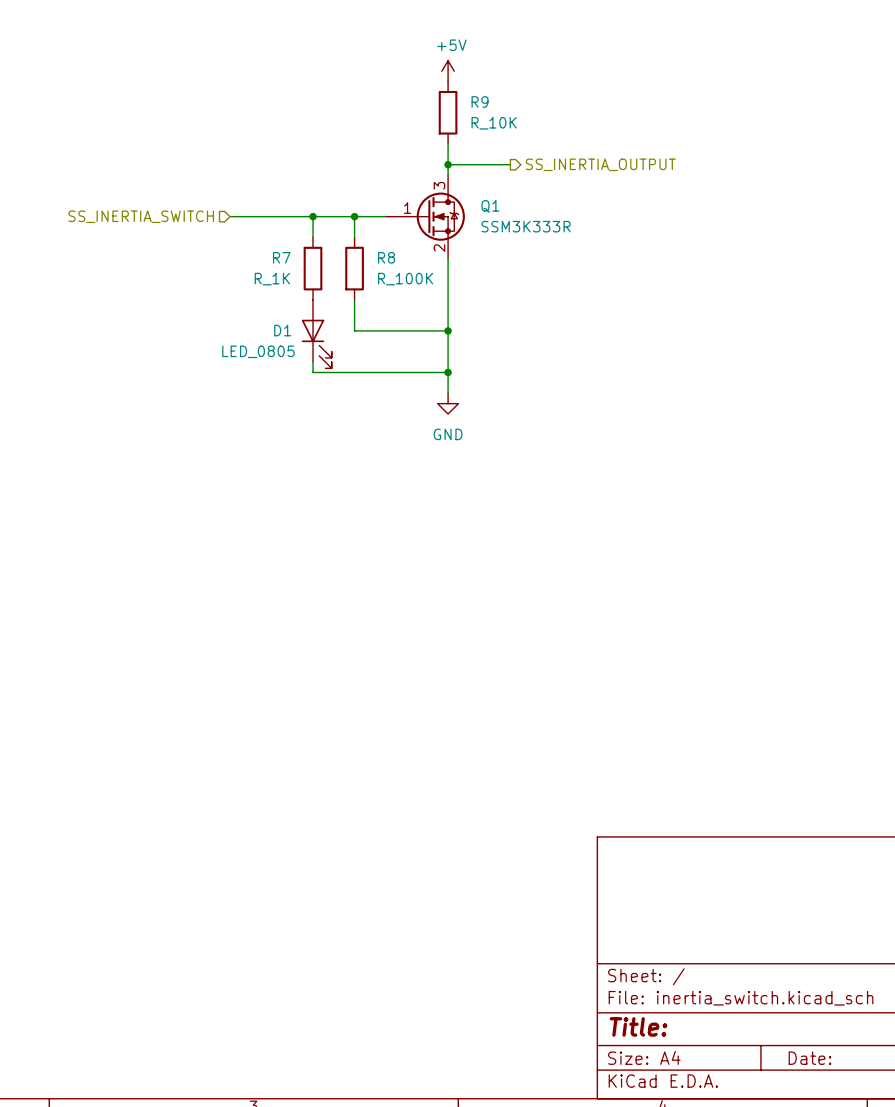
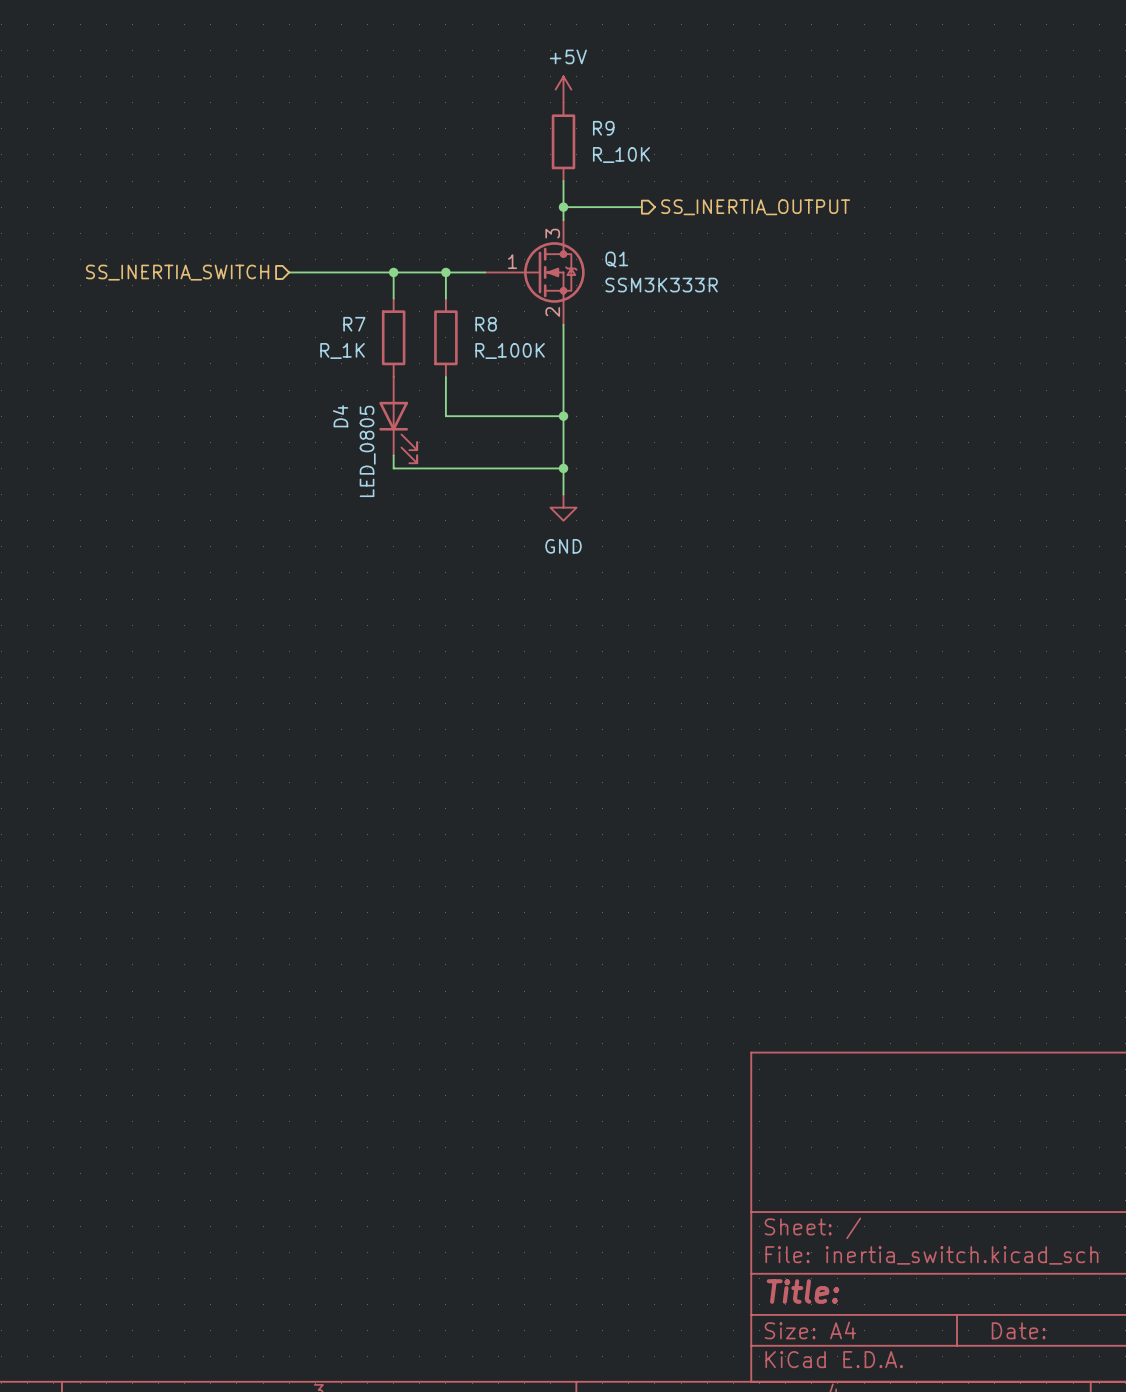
D1: LED_0805 (316, 334) -> none
D4: none -> LED_0805 (398, 420)

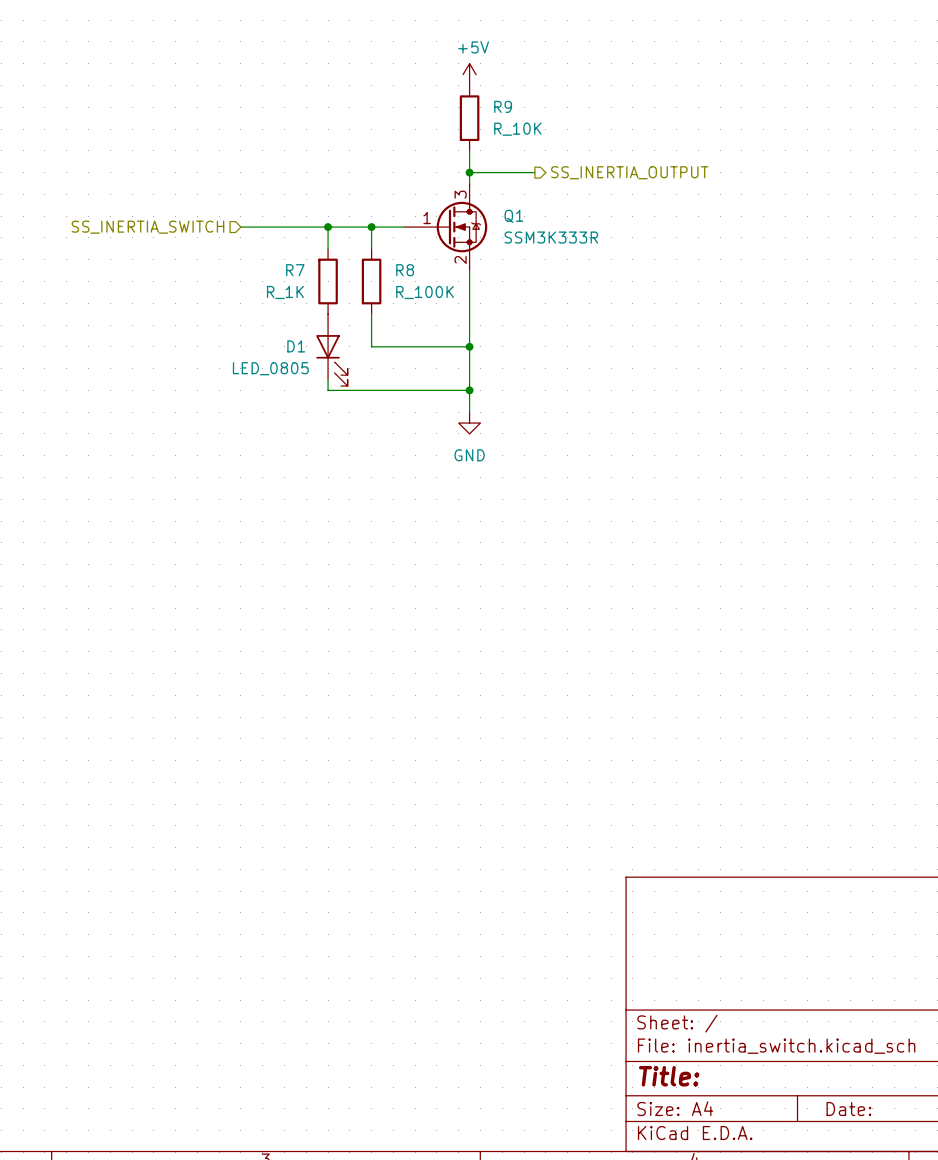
D4: LED_0805 (398, 420) -> none
D1: none -> LED_0805 (331, 350)

